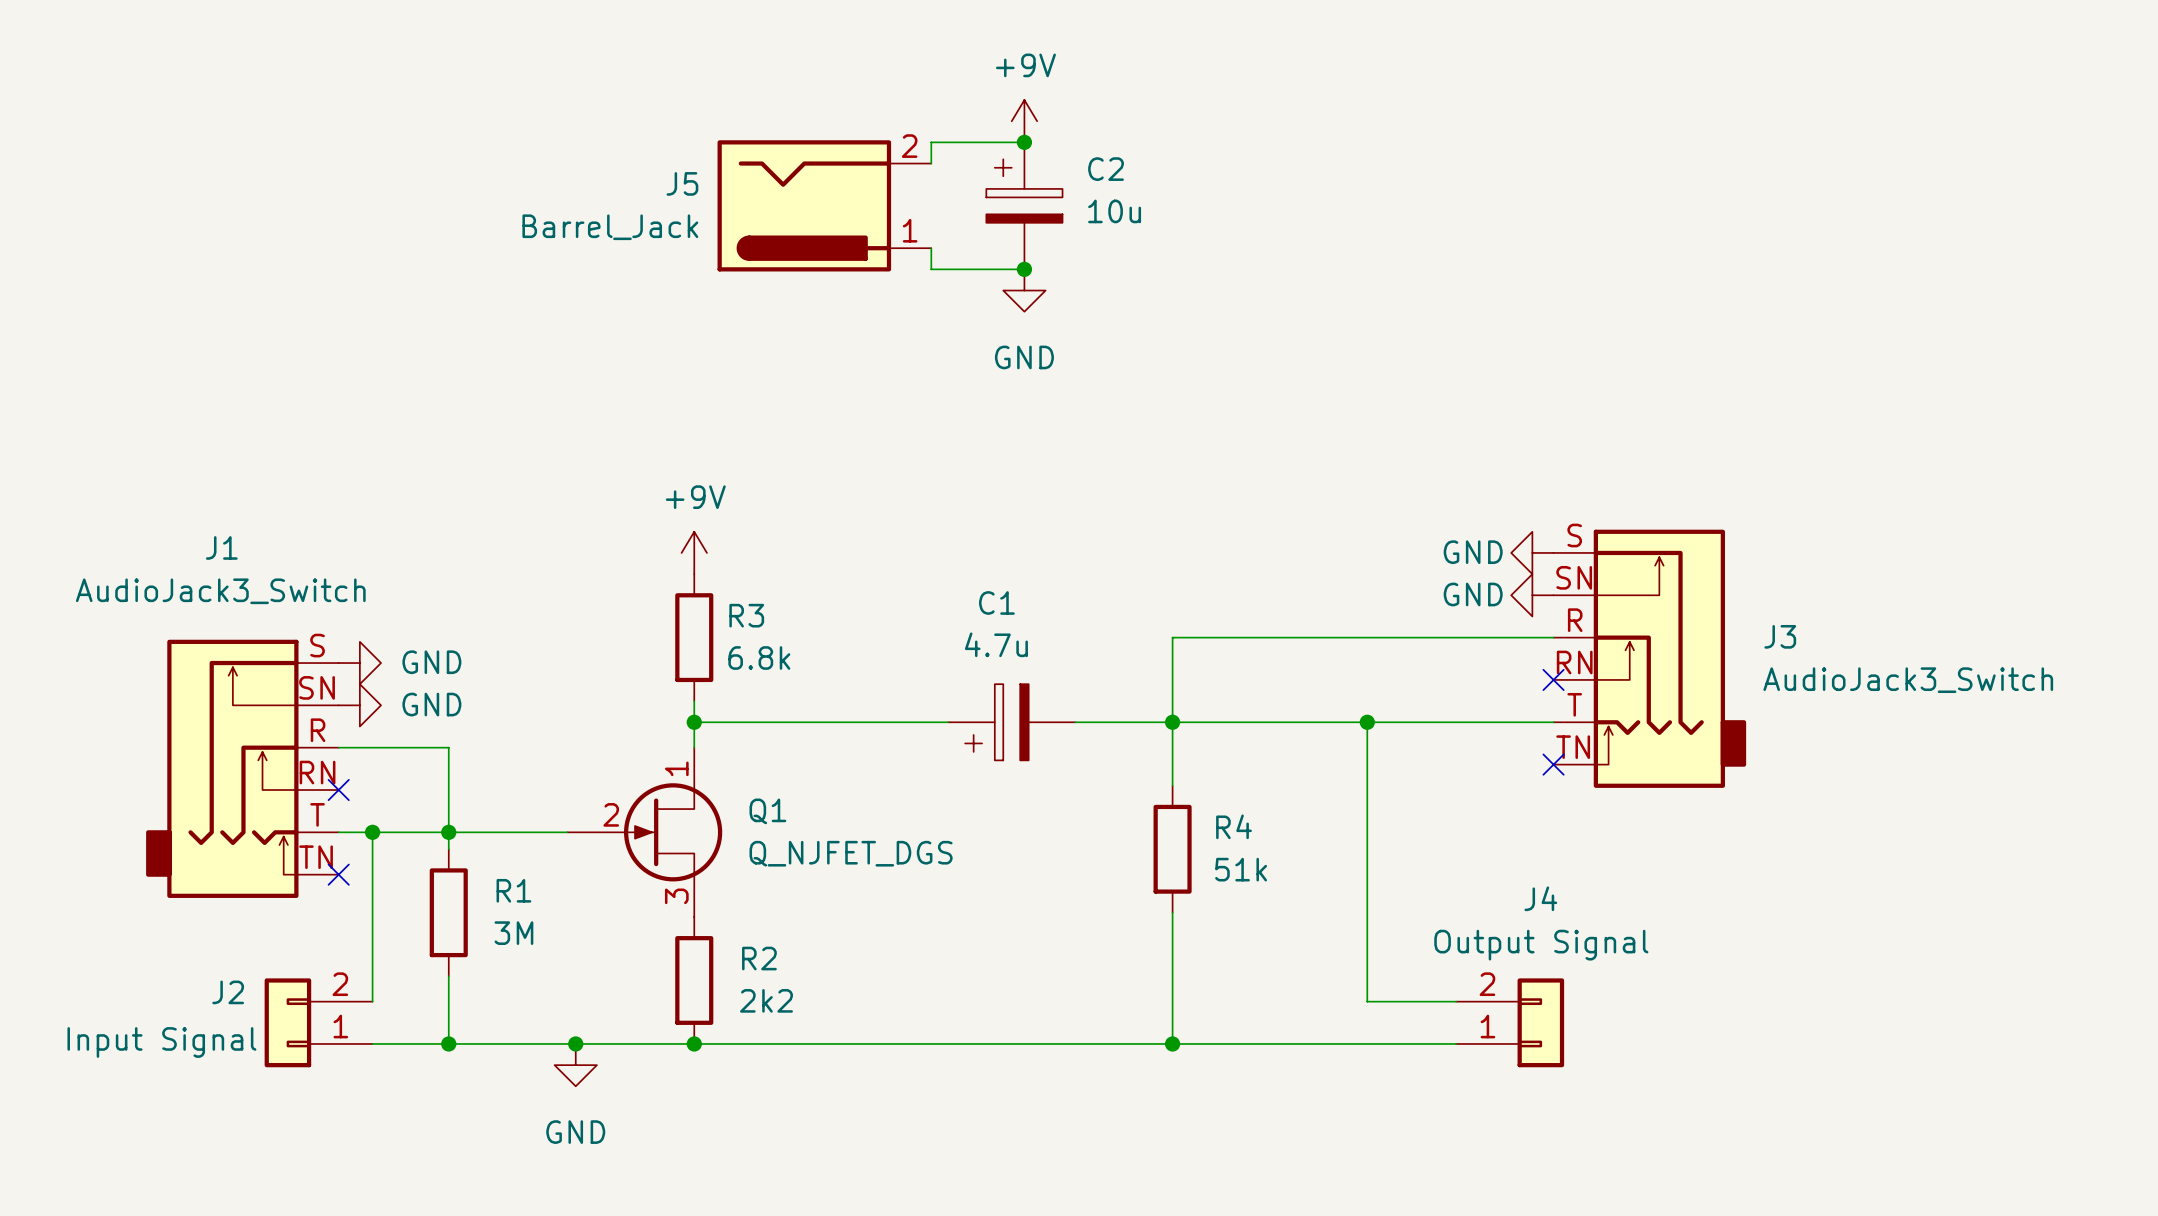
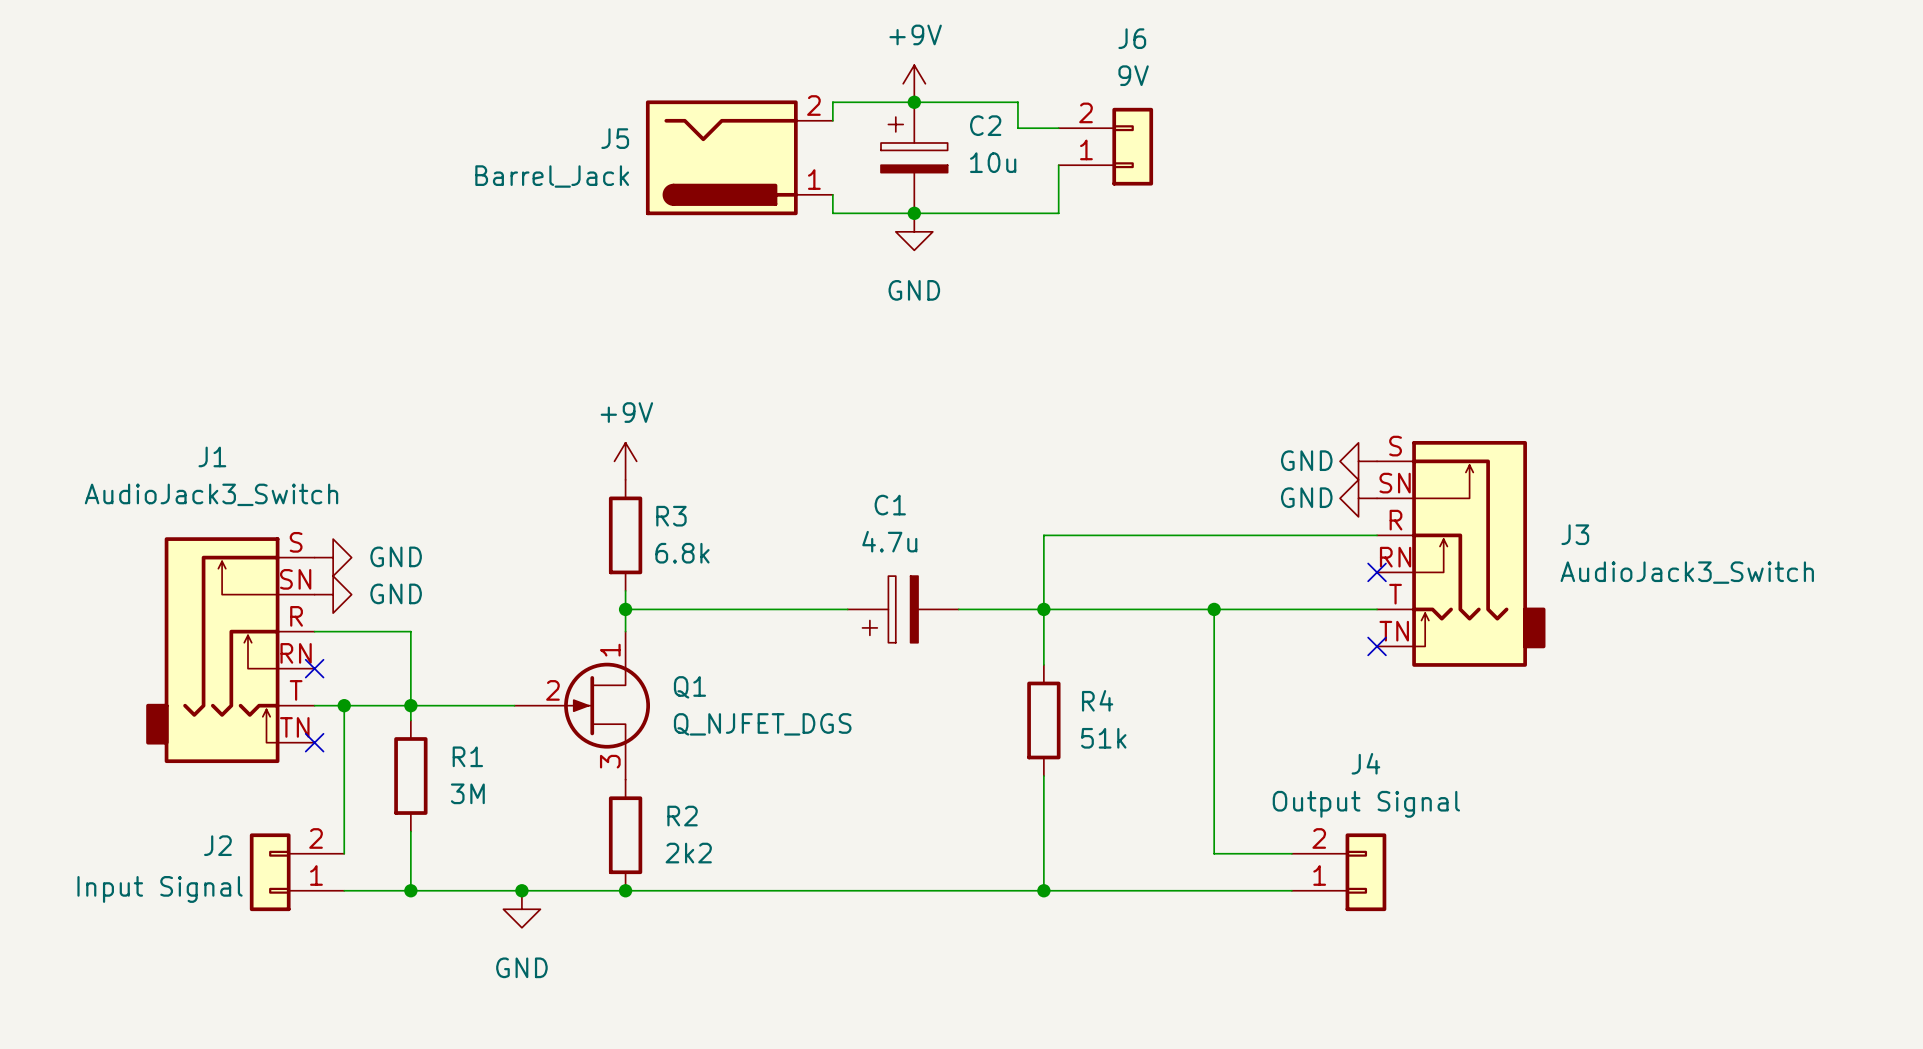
wire: none -> (914, 102) (1017, 102) (1017, 128) (1058, 128)
J6: none -> 9V (1105, 146)
wire: none -> (1058, 165) (1058, 213) (914, 213)

